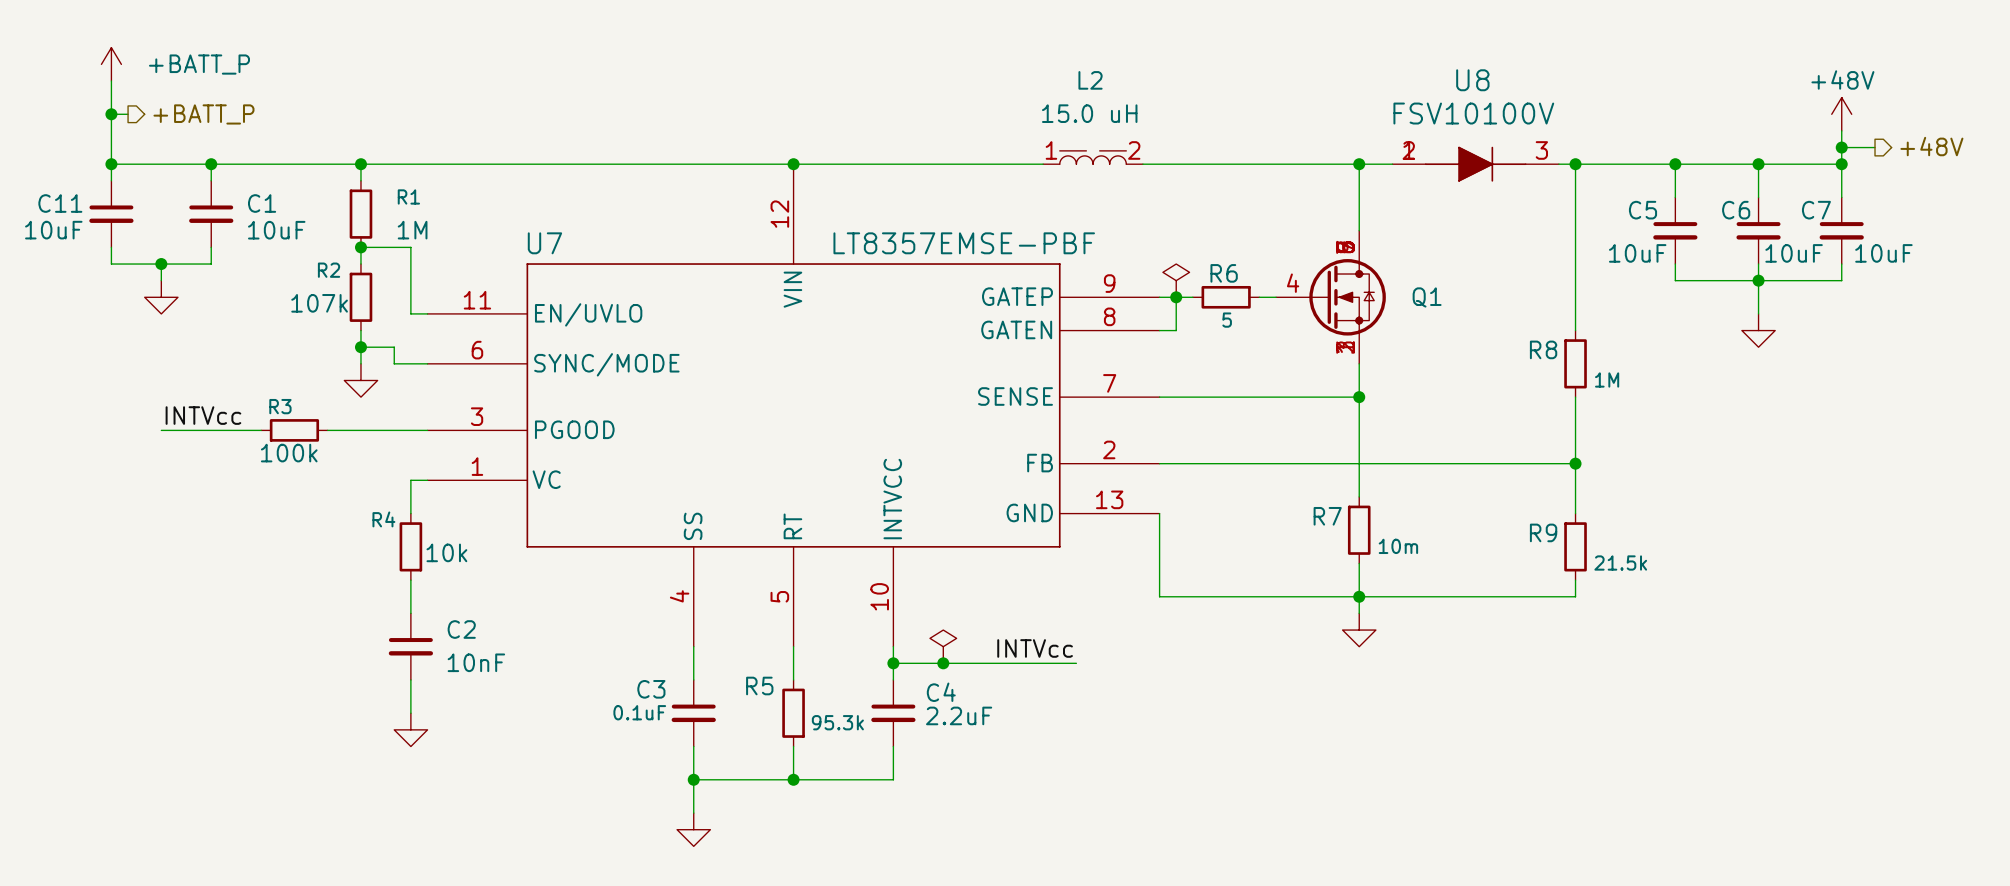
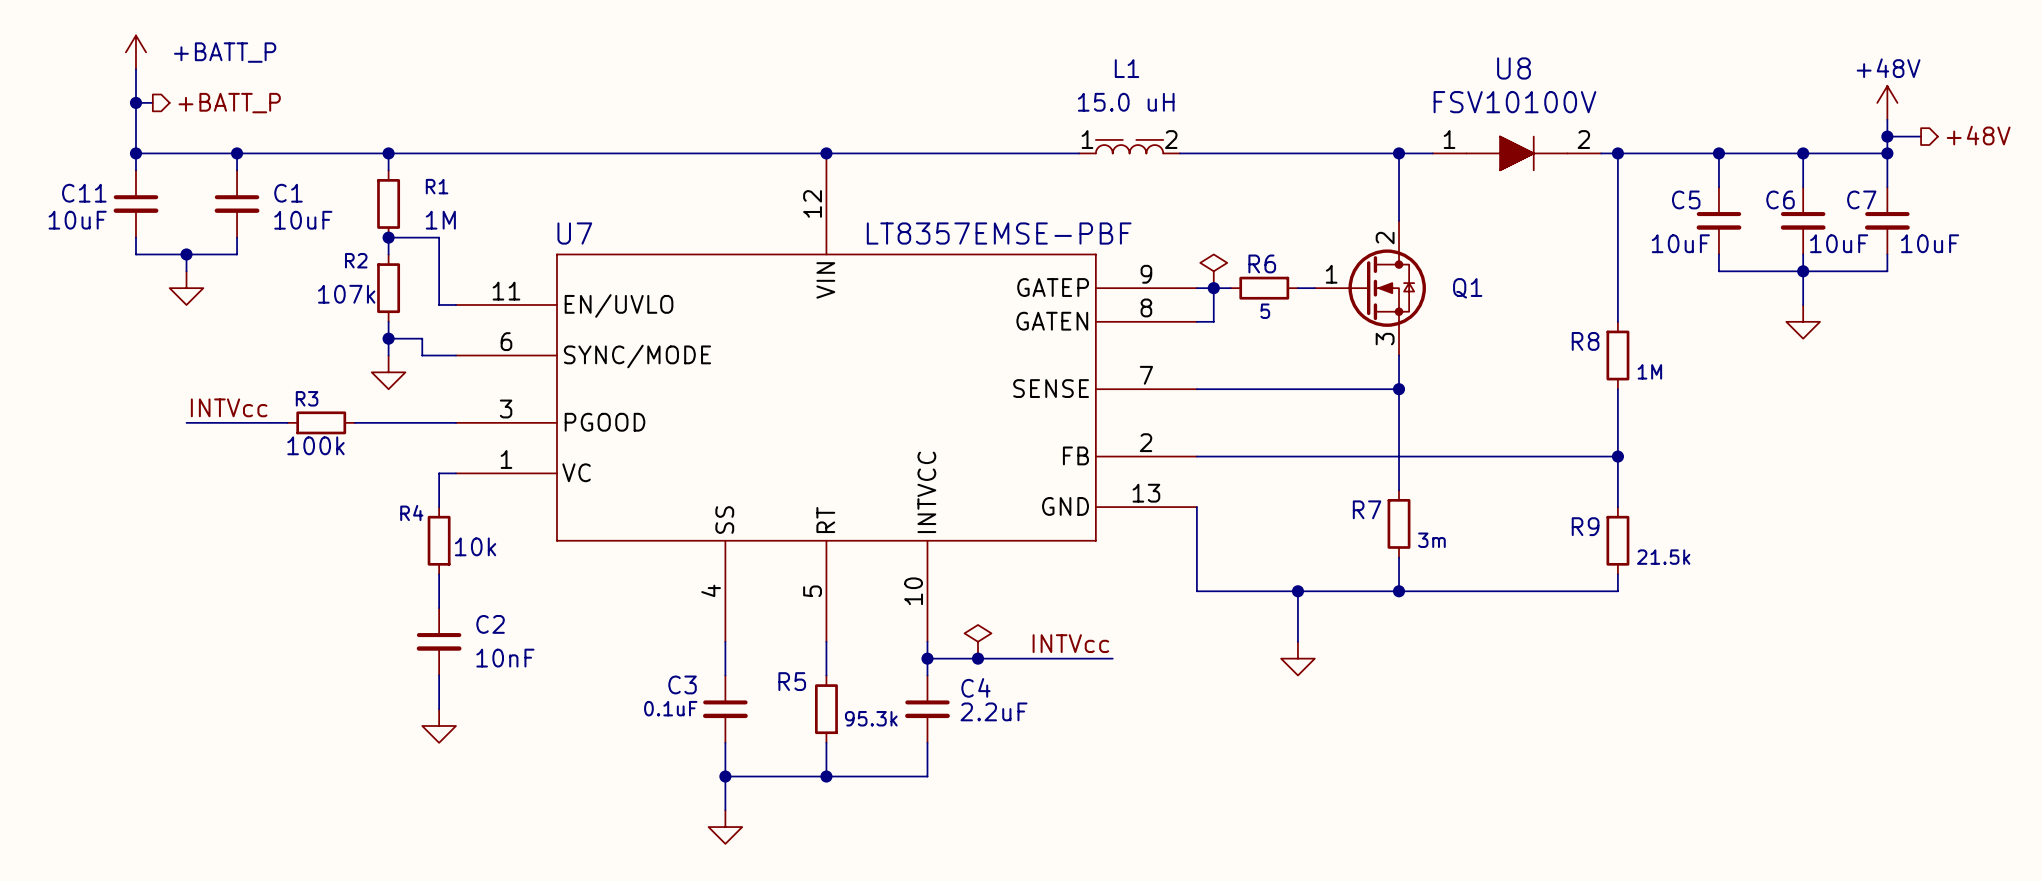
L2 name: L2 (1090, 80) -> L1 (1127, 68)
U8 symbol: [1392, 146, 1559, 182] -> [1432, 135, 1602, 172]
Q1 symbol: [1276, 230, 1386, 364] -> [1314, 220, 1426, 356]
R7 value: 10m (1398, 546) -> 3m (1431, 540)
wire: none -> (1297, 591) (1297, 641)
junction: none -> (1297, 591)
wire: (1359, 596) (1359, 613) -> none
power symbol position: (1359, 630) -> (1297, 658)

